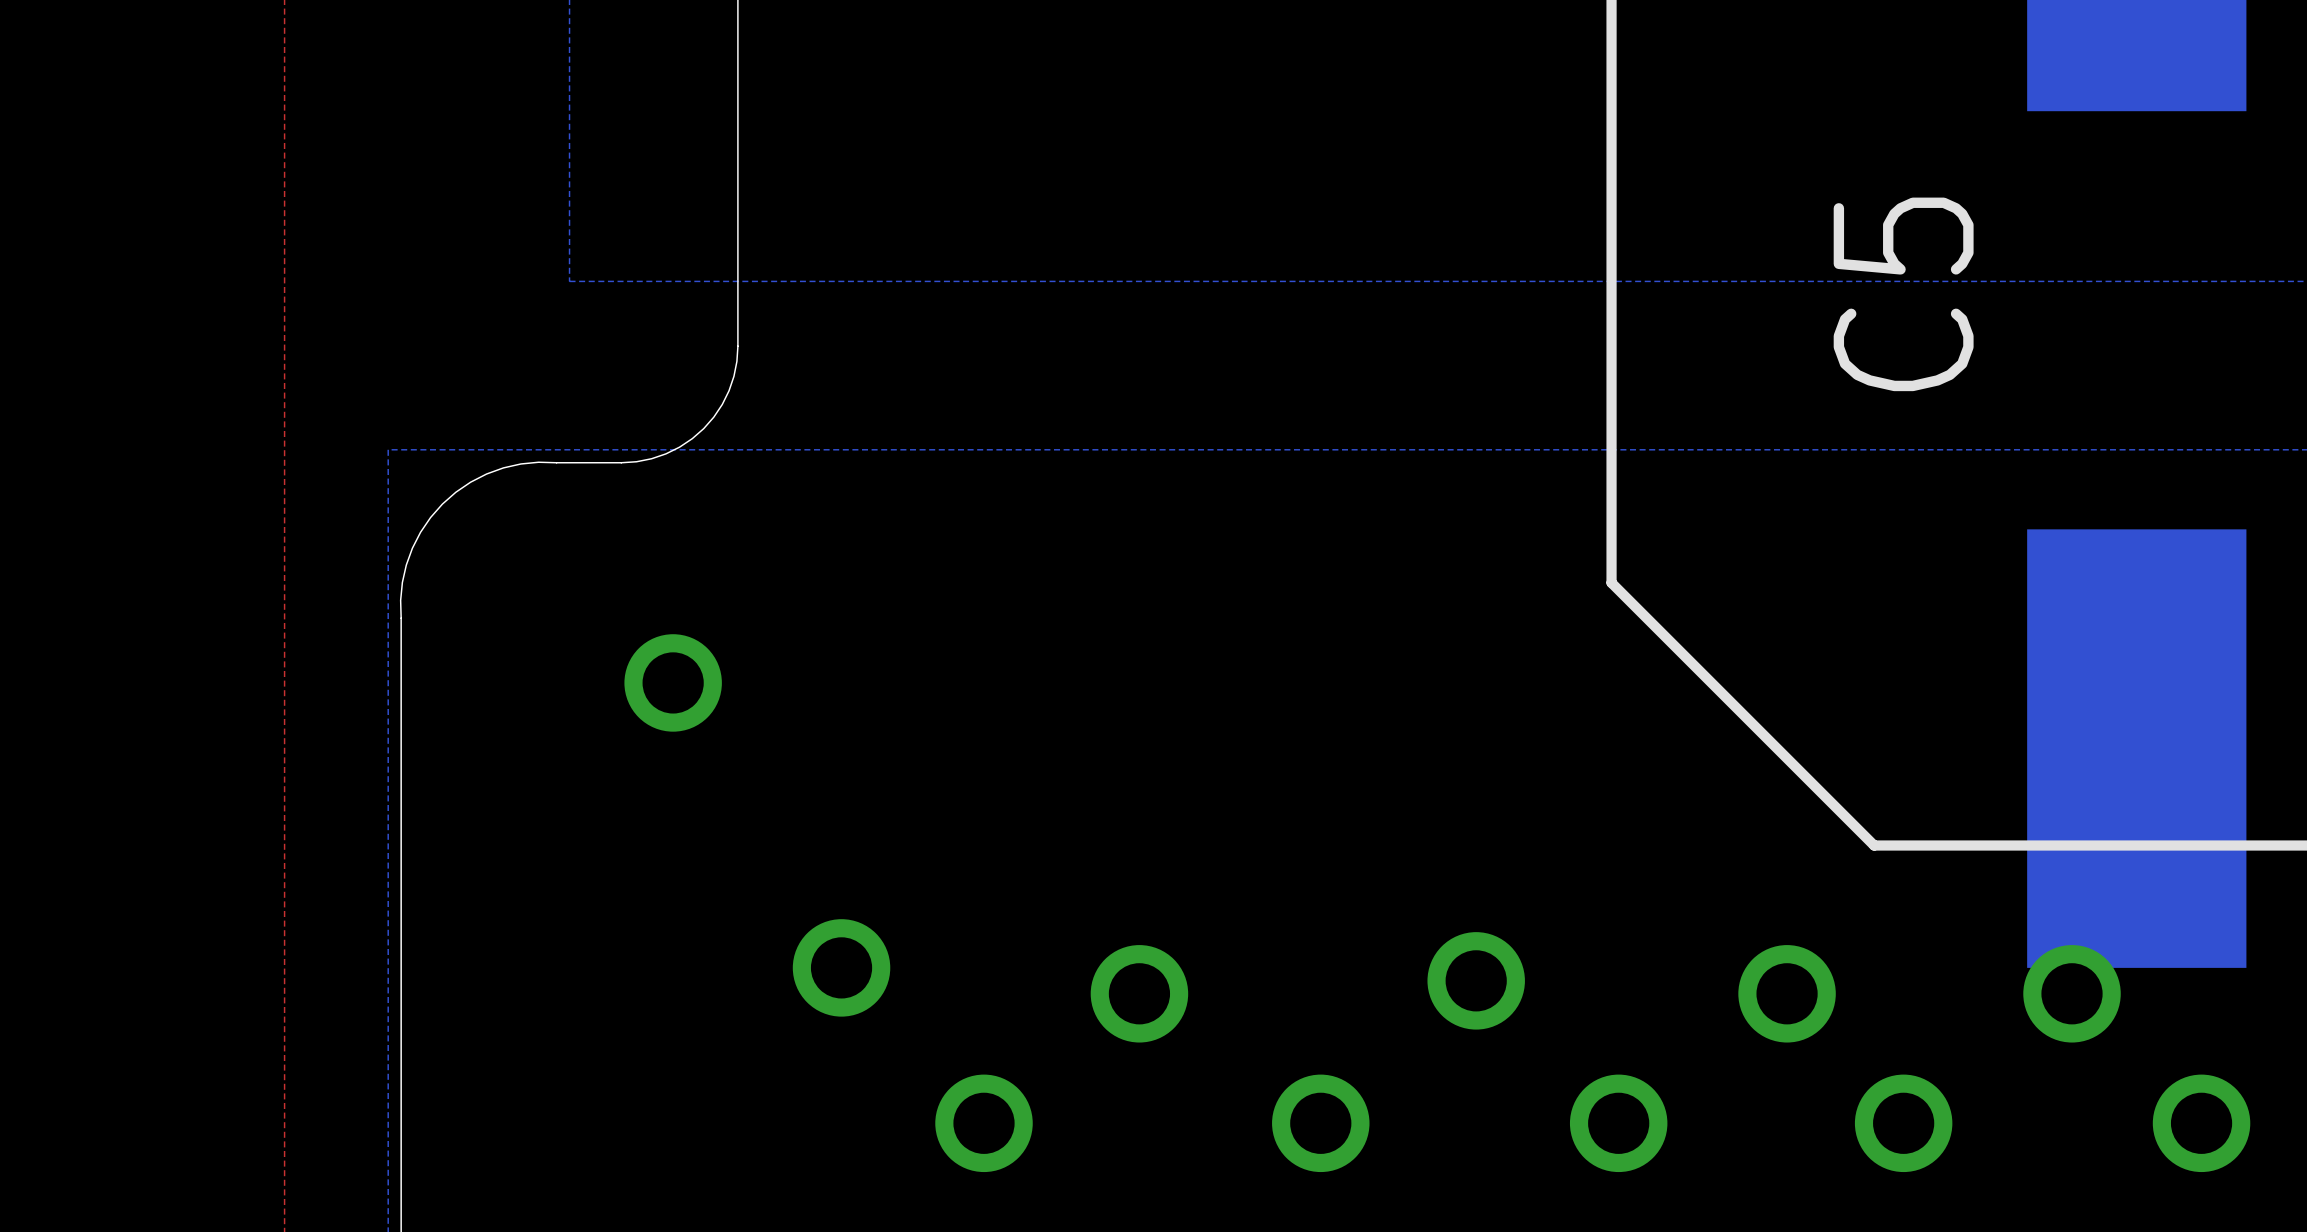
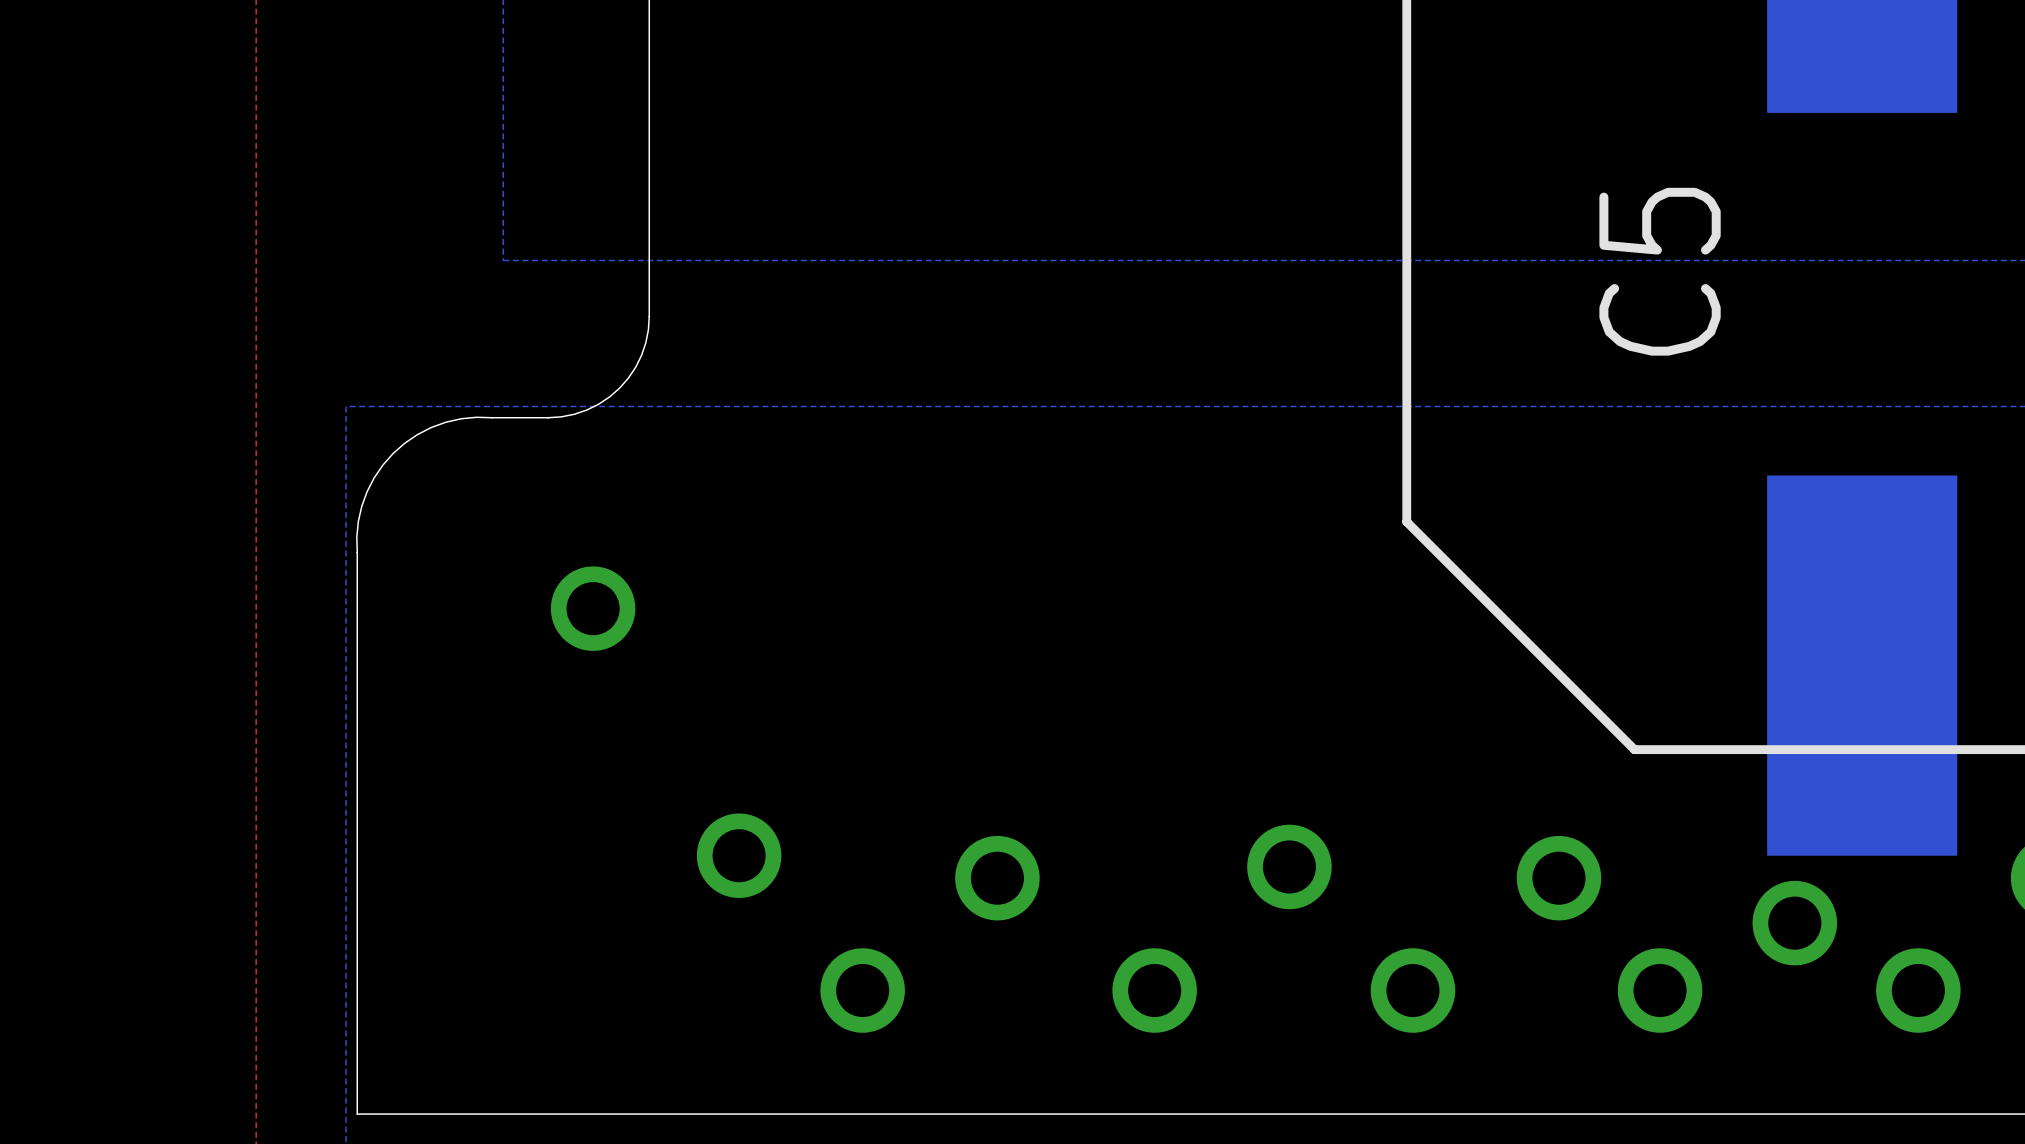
via position: (2072, 993) -> (1794, 923)

